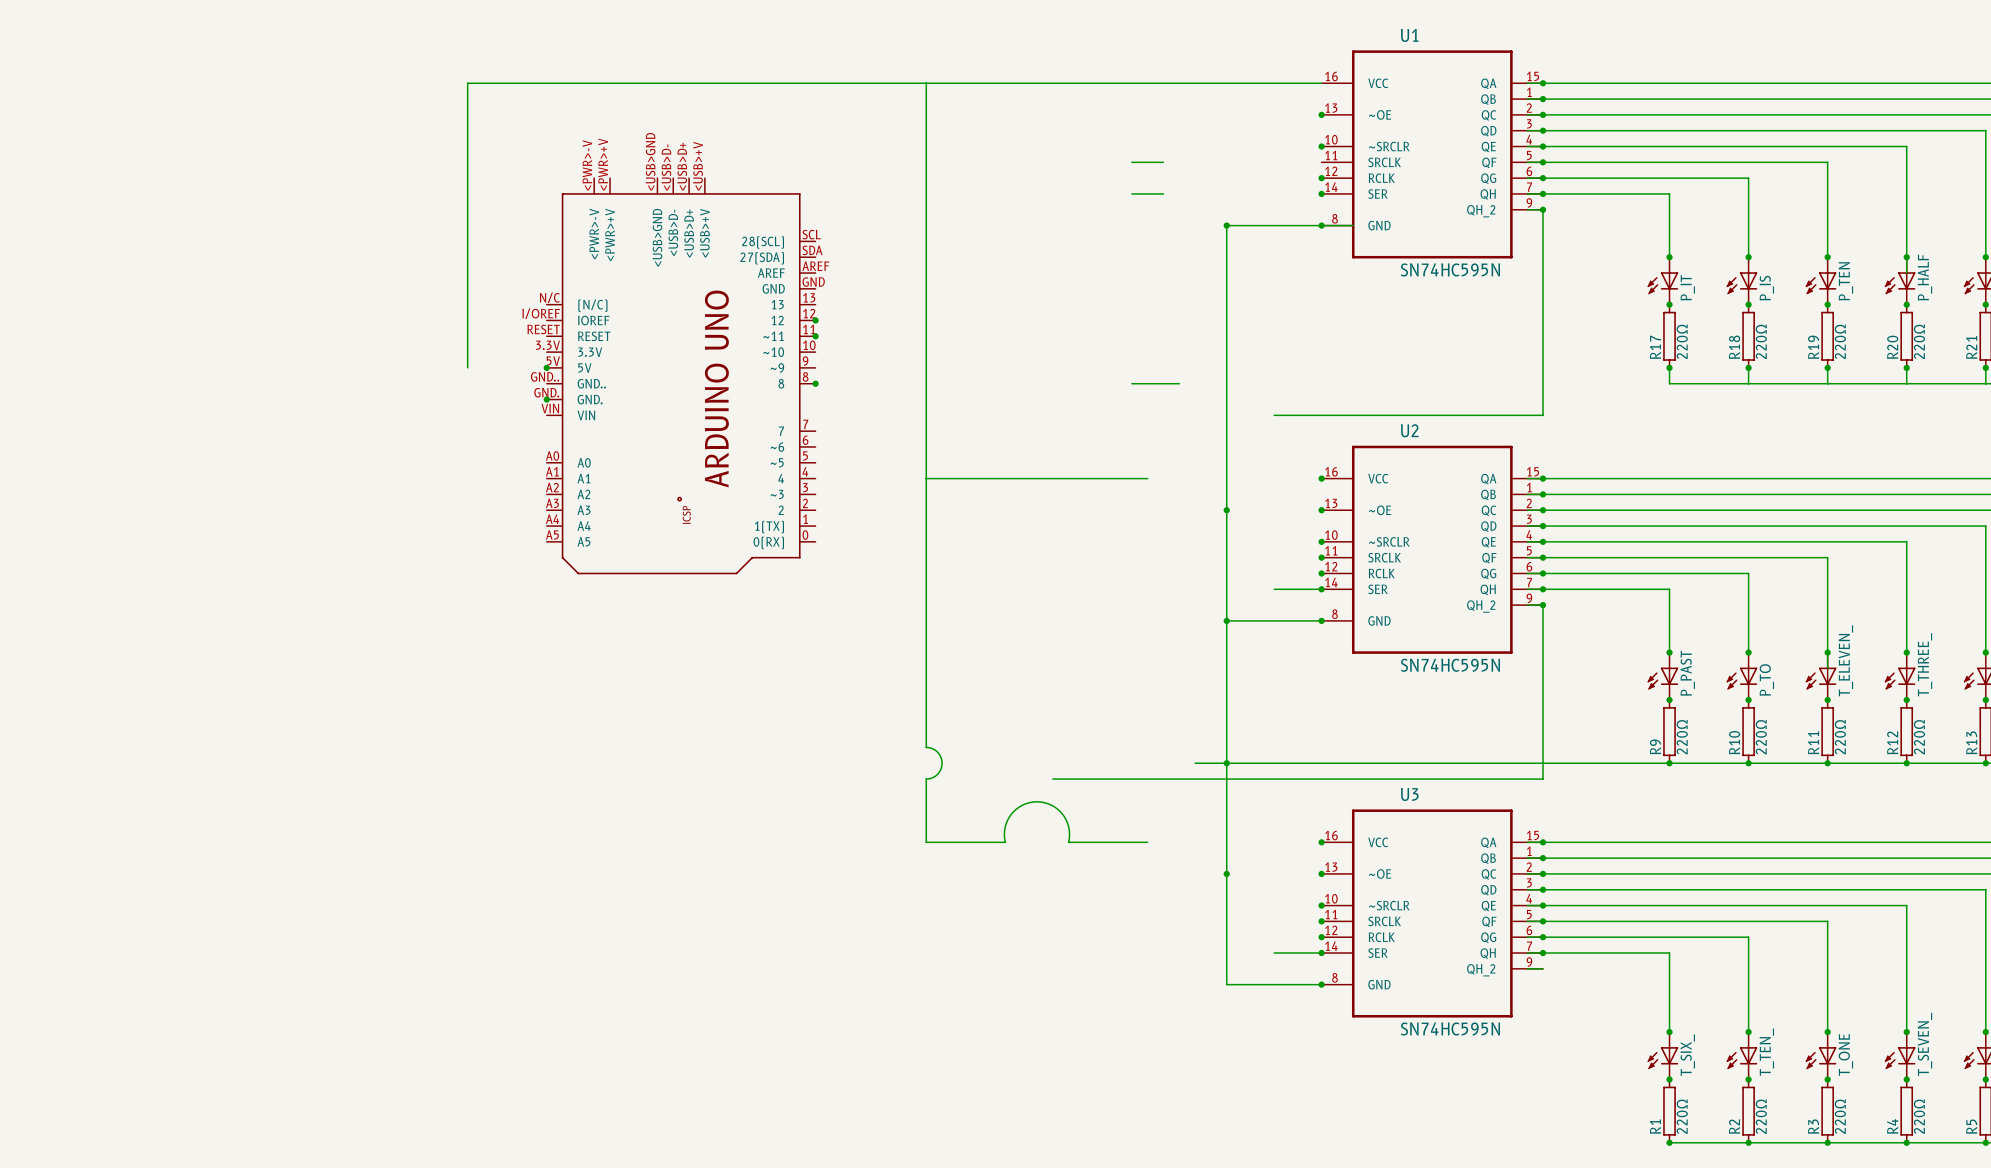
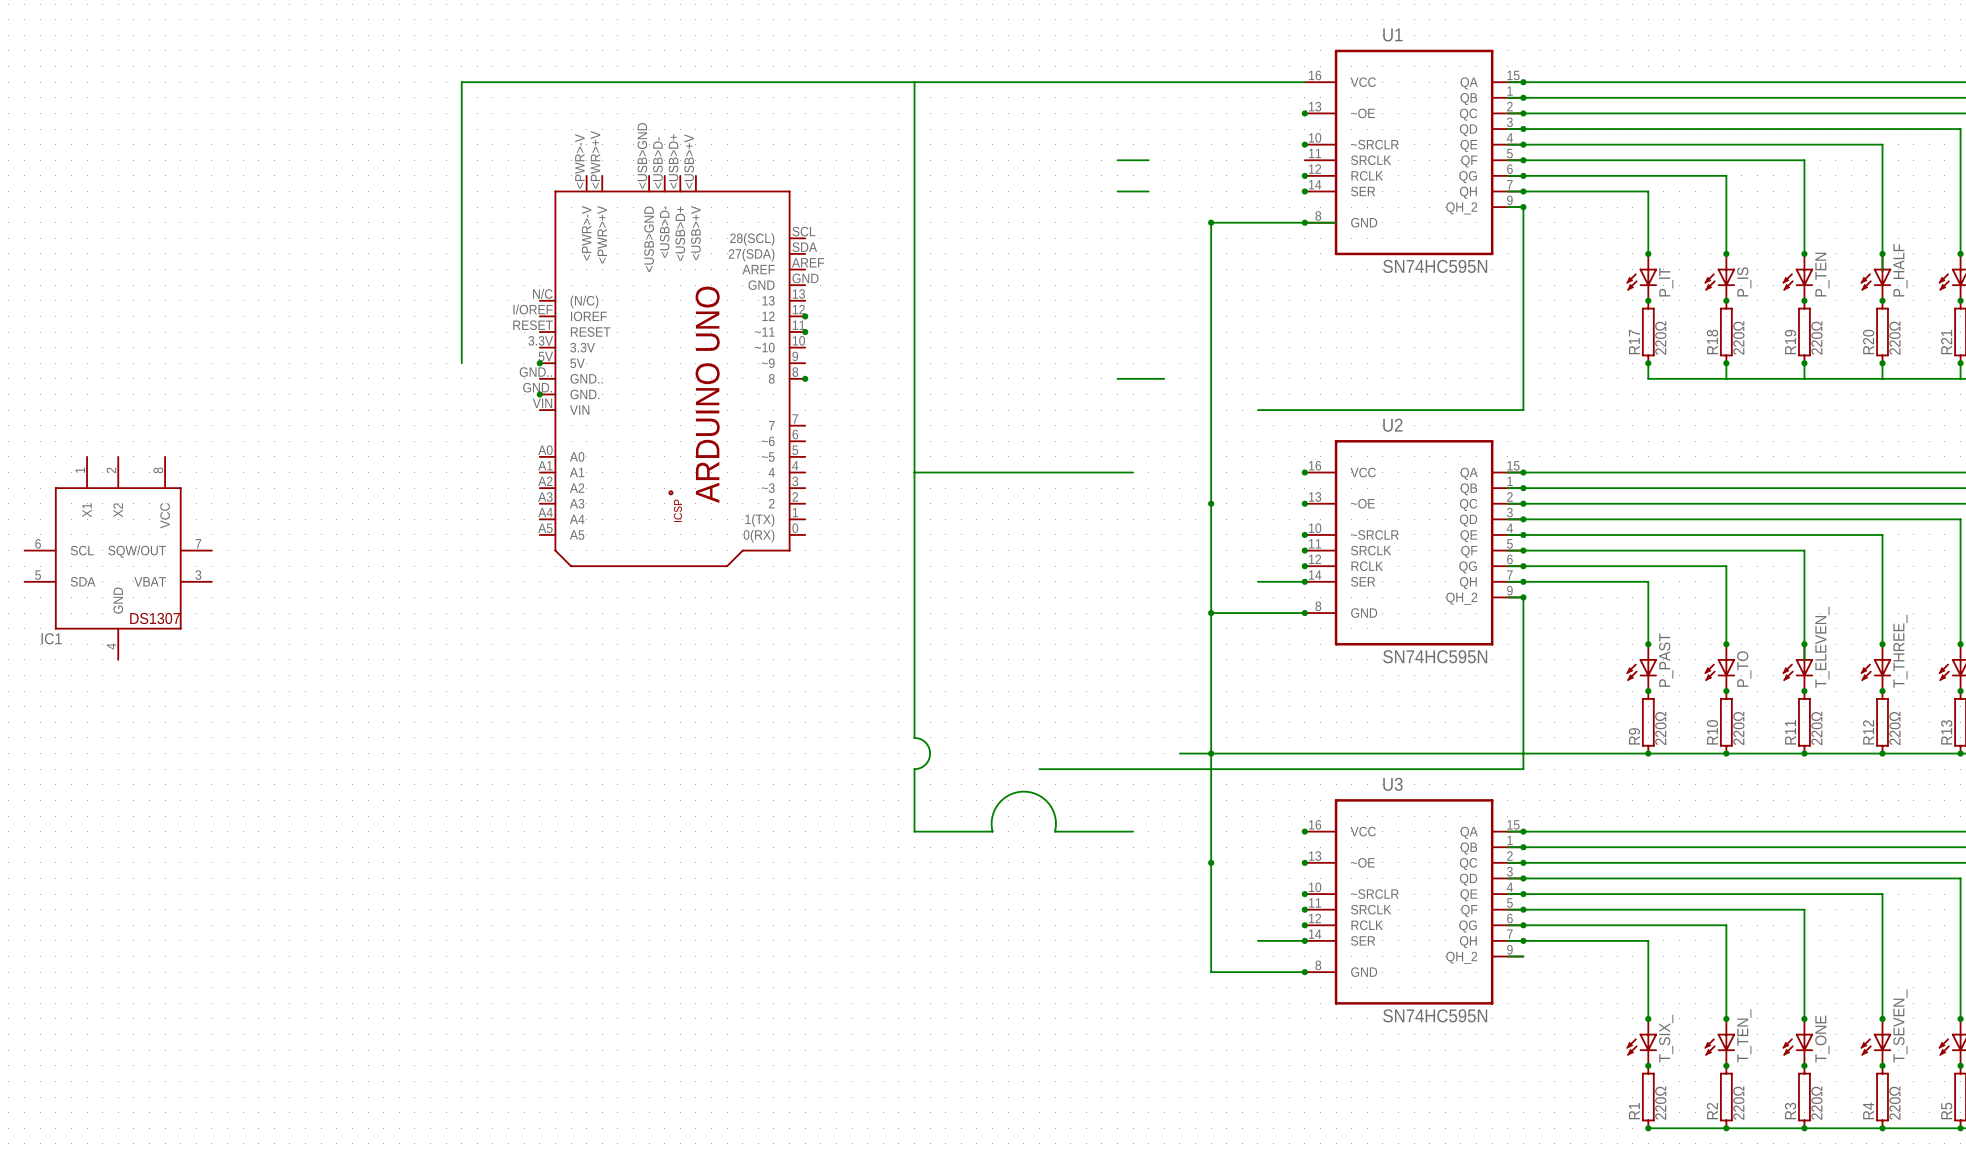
IC1: none -> (118, 558)

